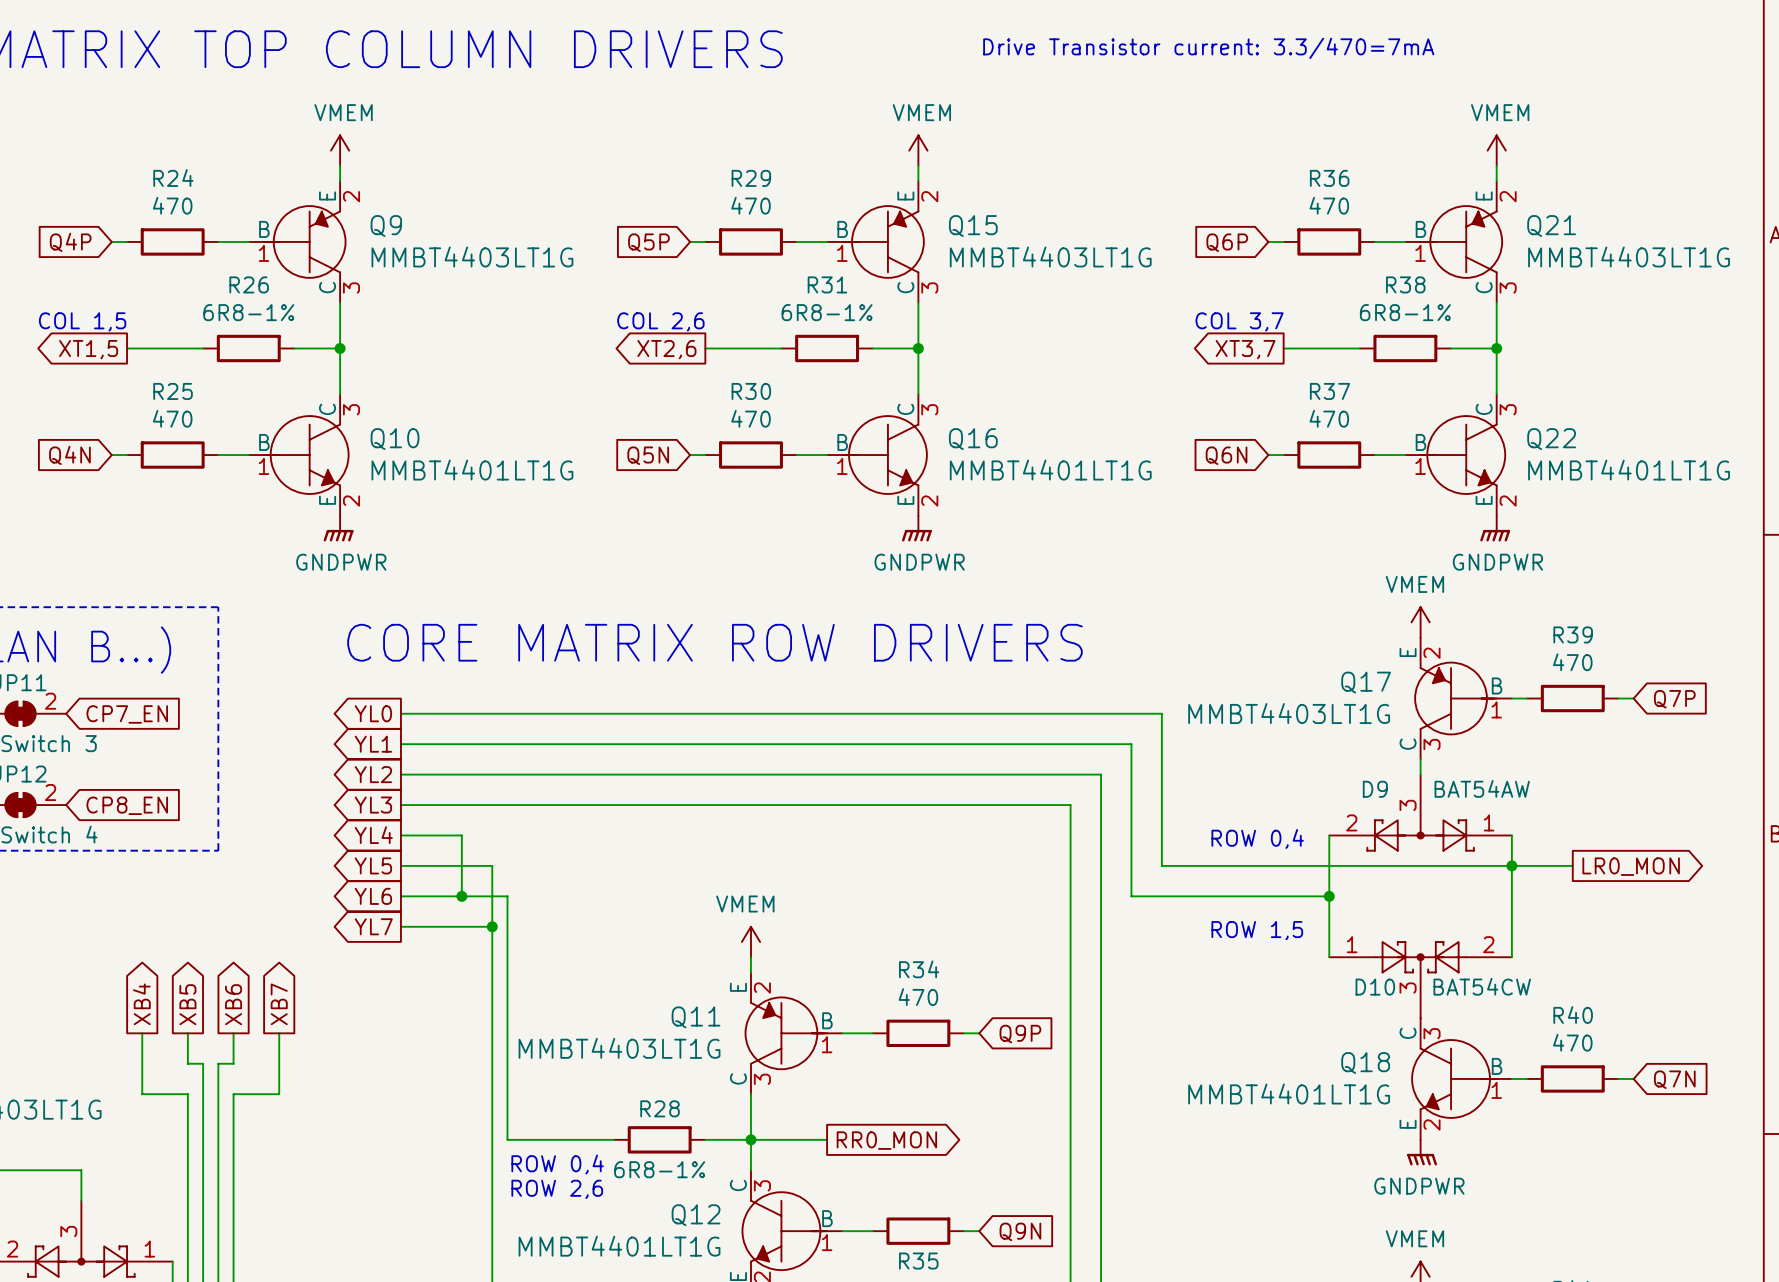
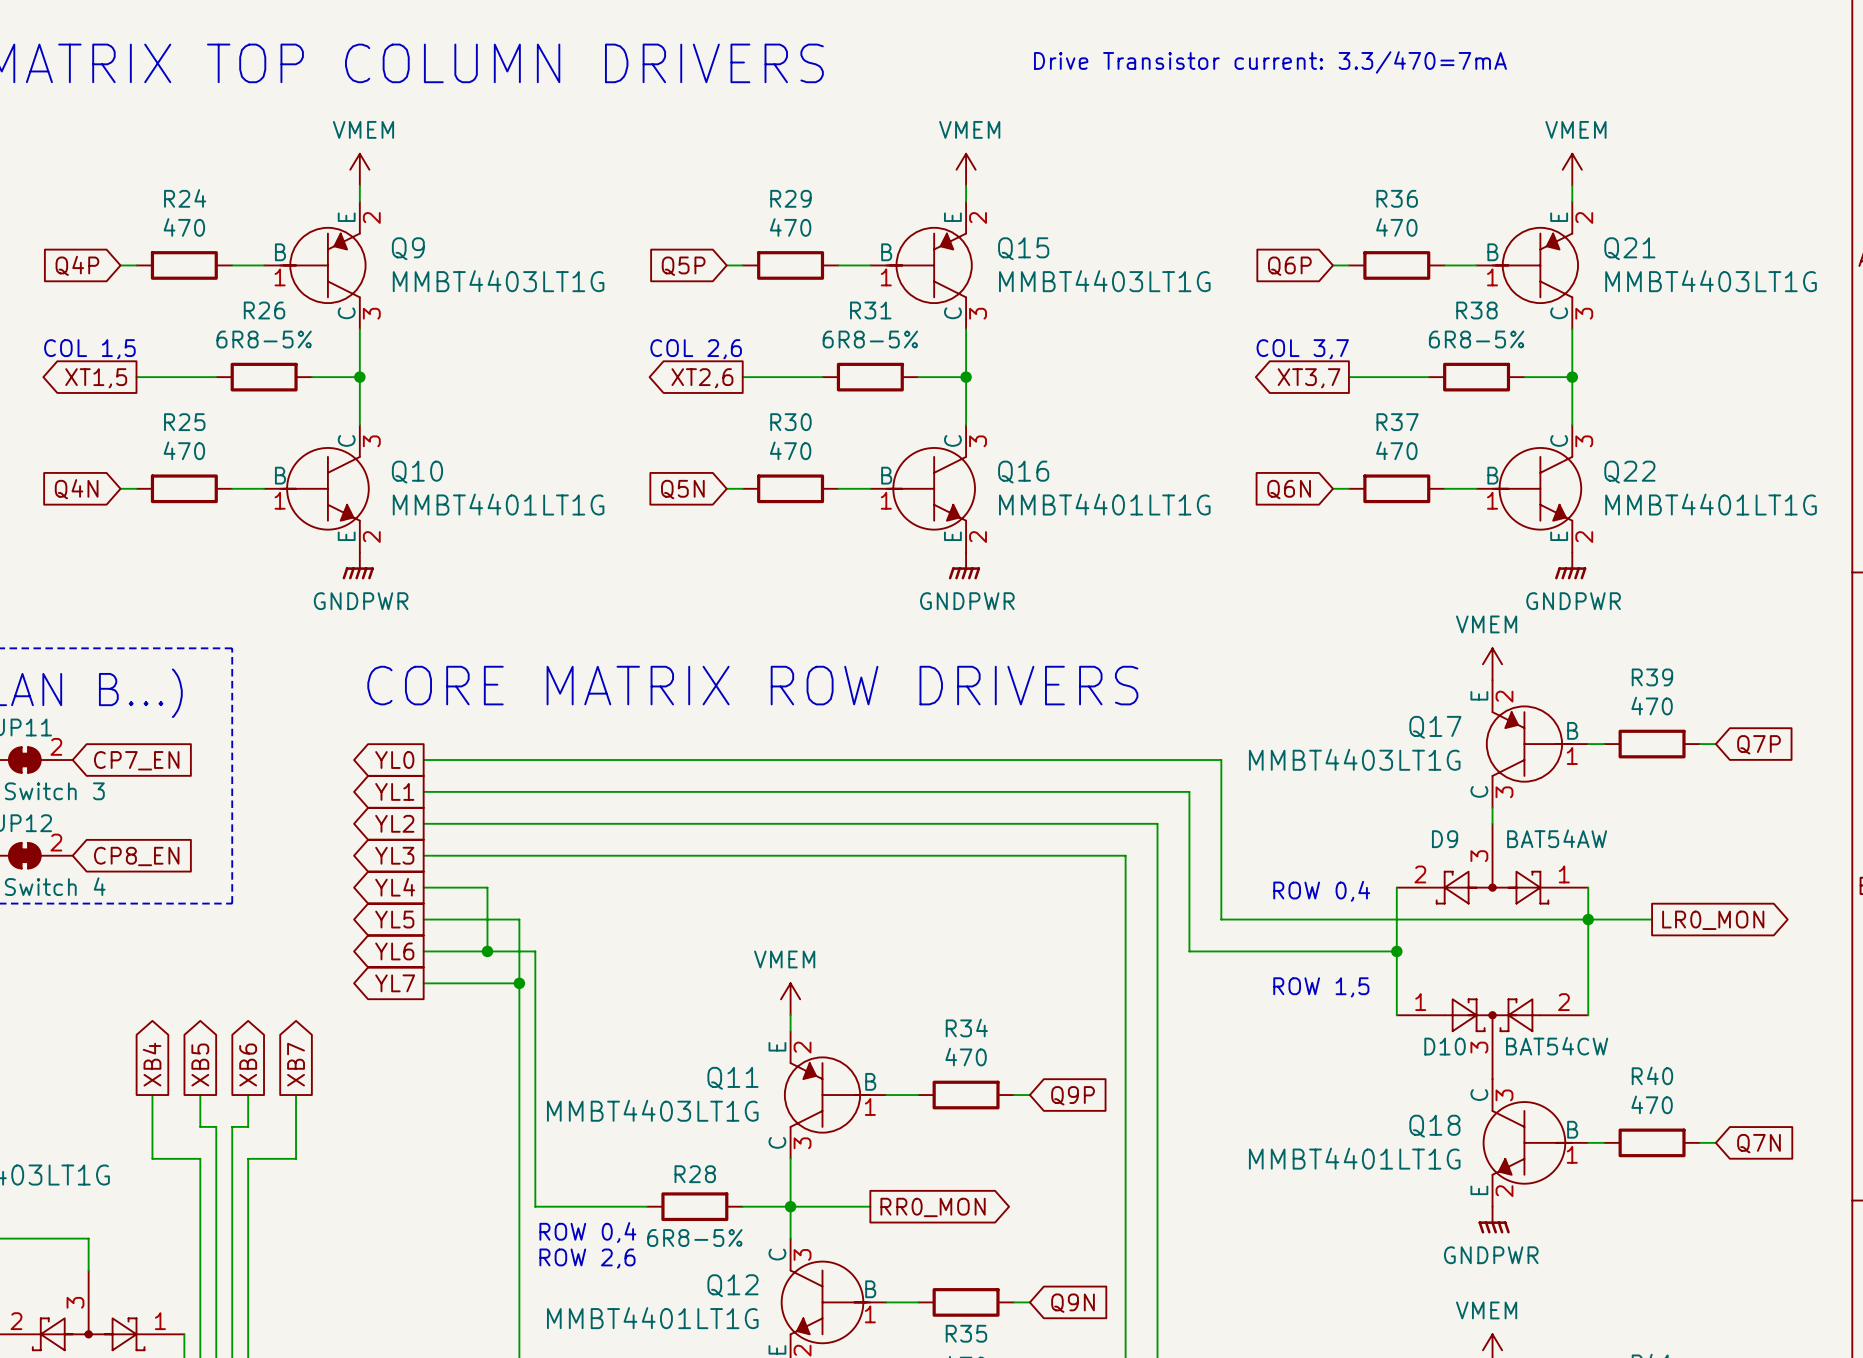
R26 value: 6R8-1% (248, 312) -> 6R8-5% (264, 339)
R31 value: 6R8-1% (827, 312) -> 6R8-5% (870, 339)
R38 value: 6R8-1% (1405, 312) -> 6R8-5% (1476, 339)
R28 value: 6R8-1% (659, 1169) -> 6R8-5% (694, 1238)

